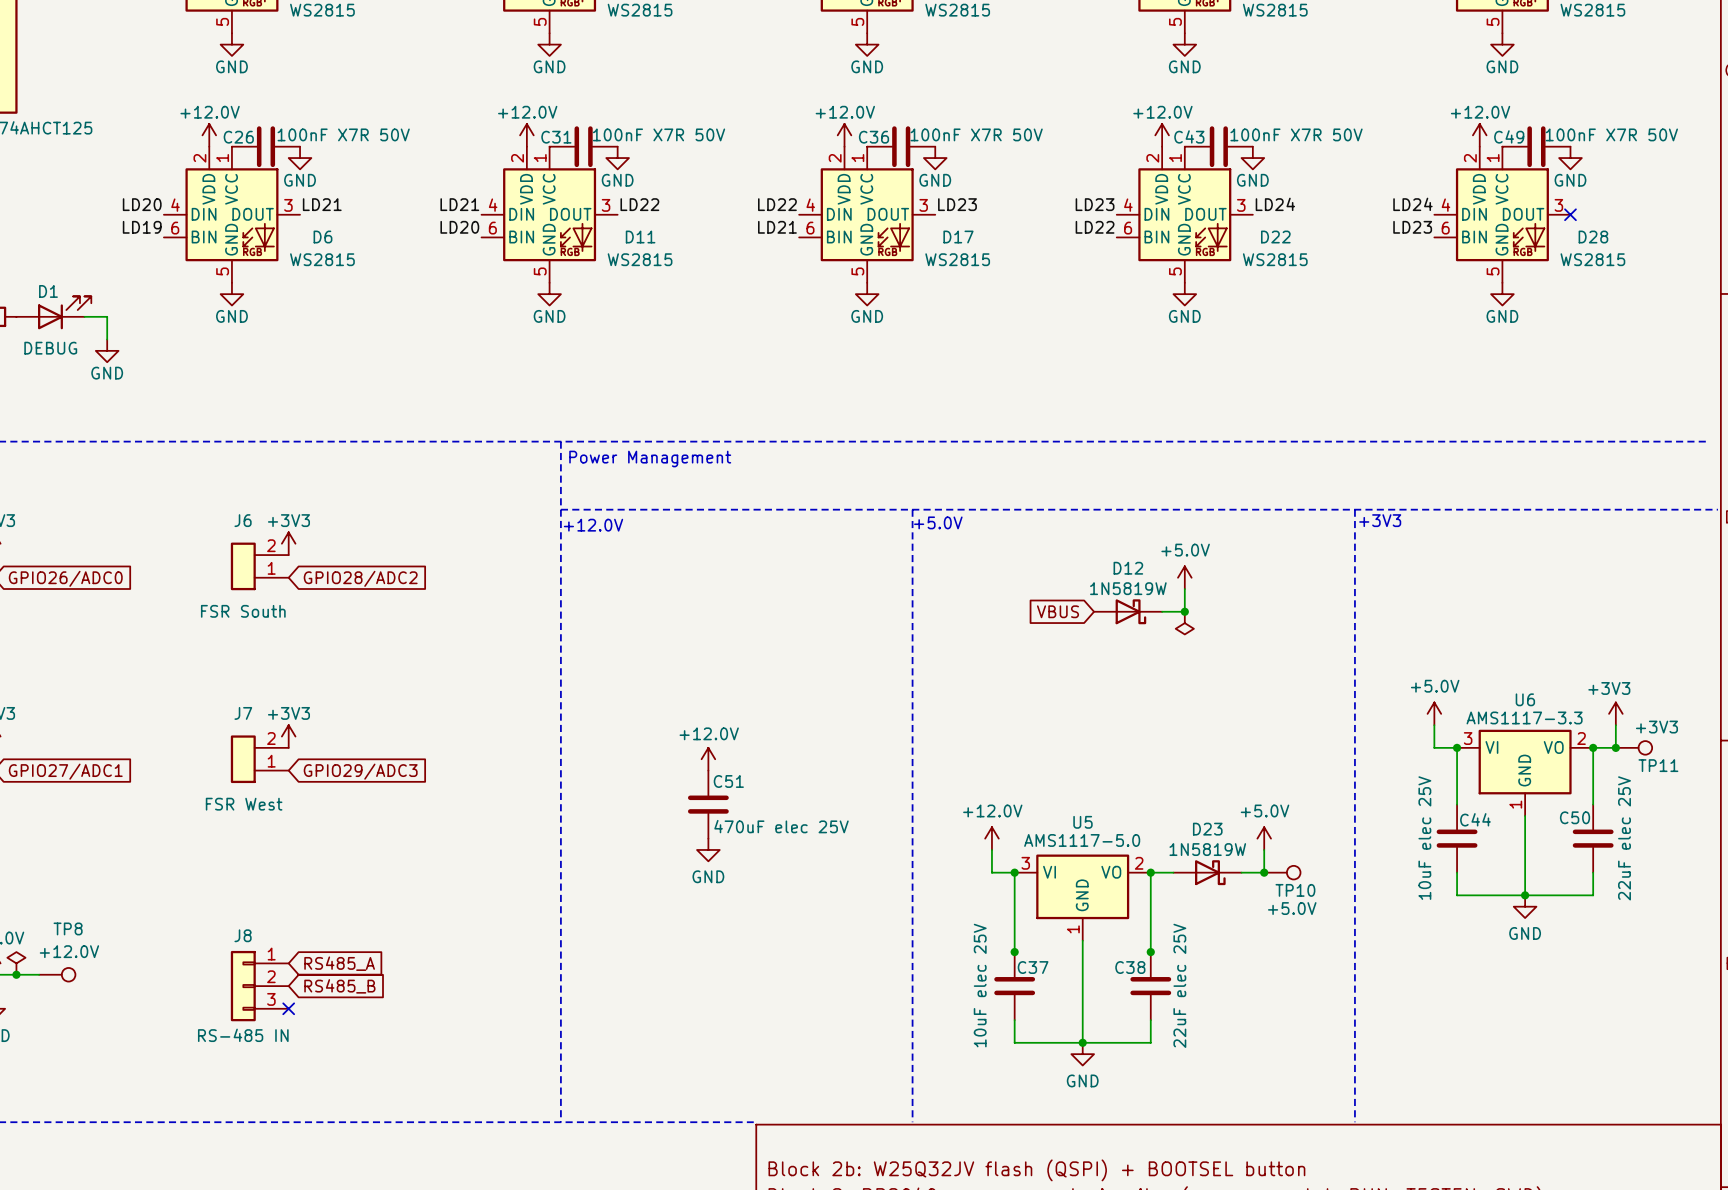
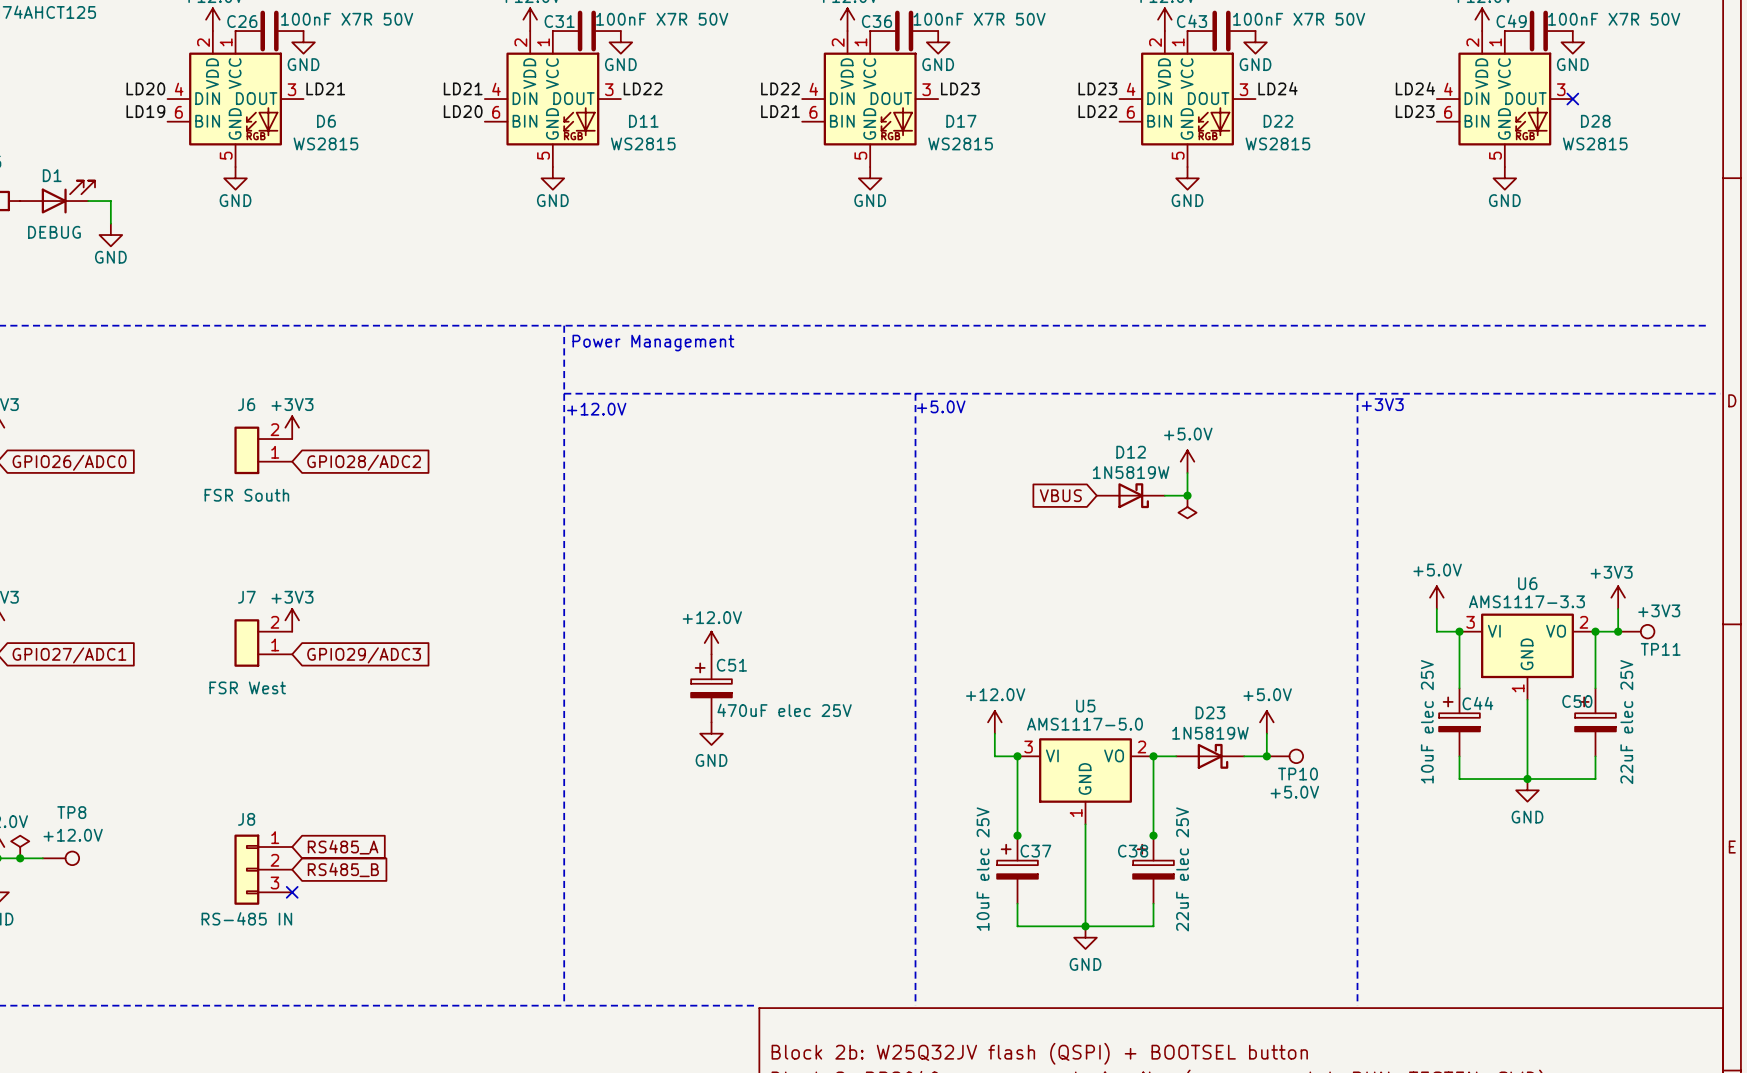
C51 symbol: [687, 770, 729, 839] -> [691, 654, 732, 723]
C44 symbol: [1436, 804, 1478, 873] -> [1439, 688, 1480, 757]
C50 symbol: [1572, 804, 1614, 873] -> [1575, 688, 1616, 757]
C37 symbol: [994, 952, 1036, 1021] -> [997, 835, 1038, 904]
C38 symbol: [1130, 952, 1172, 1021] -> [1133, 835, 1174, 904]

